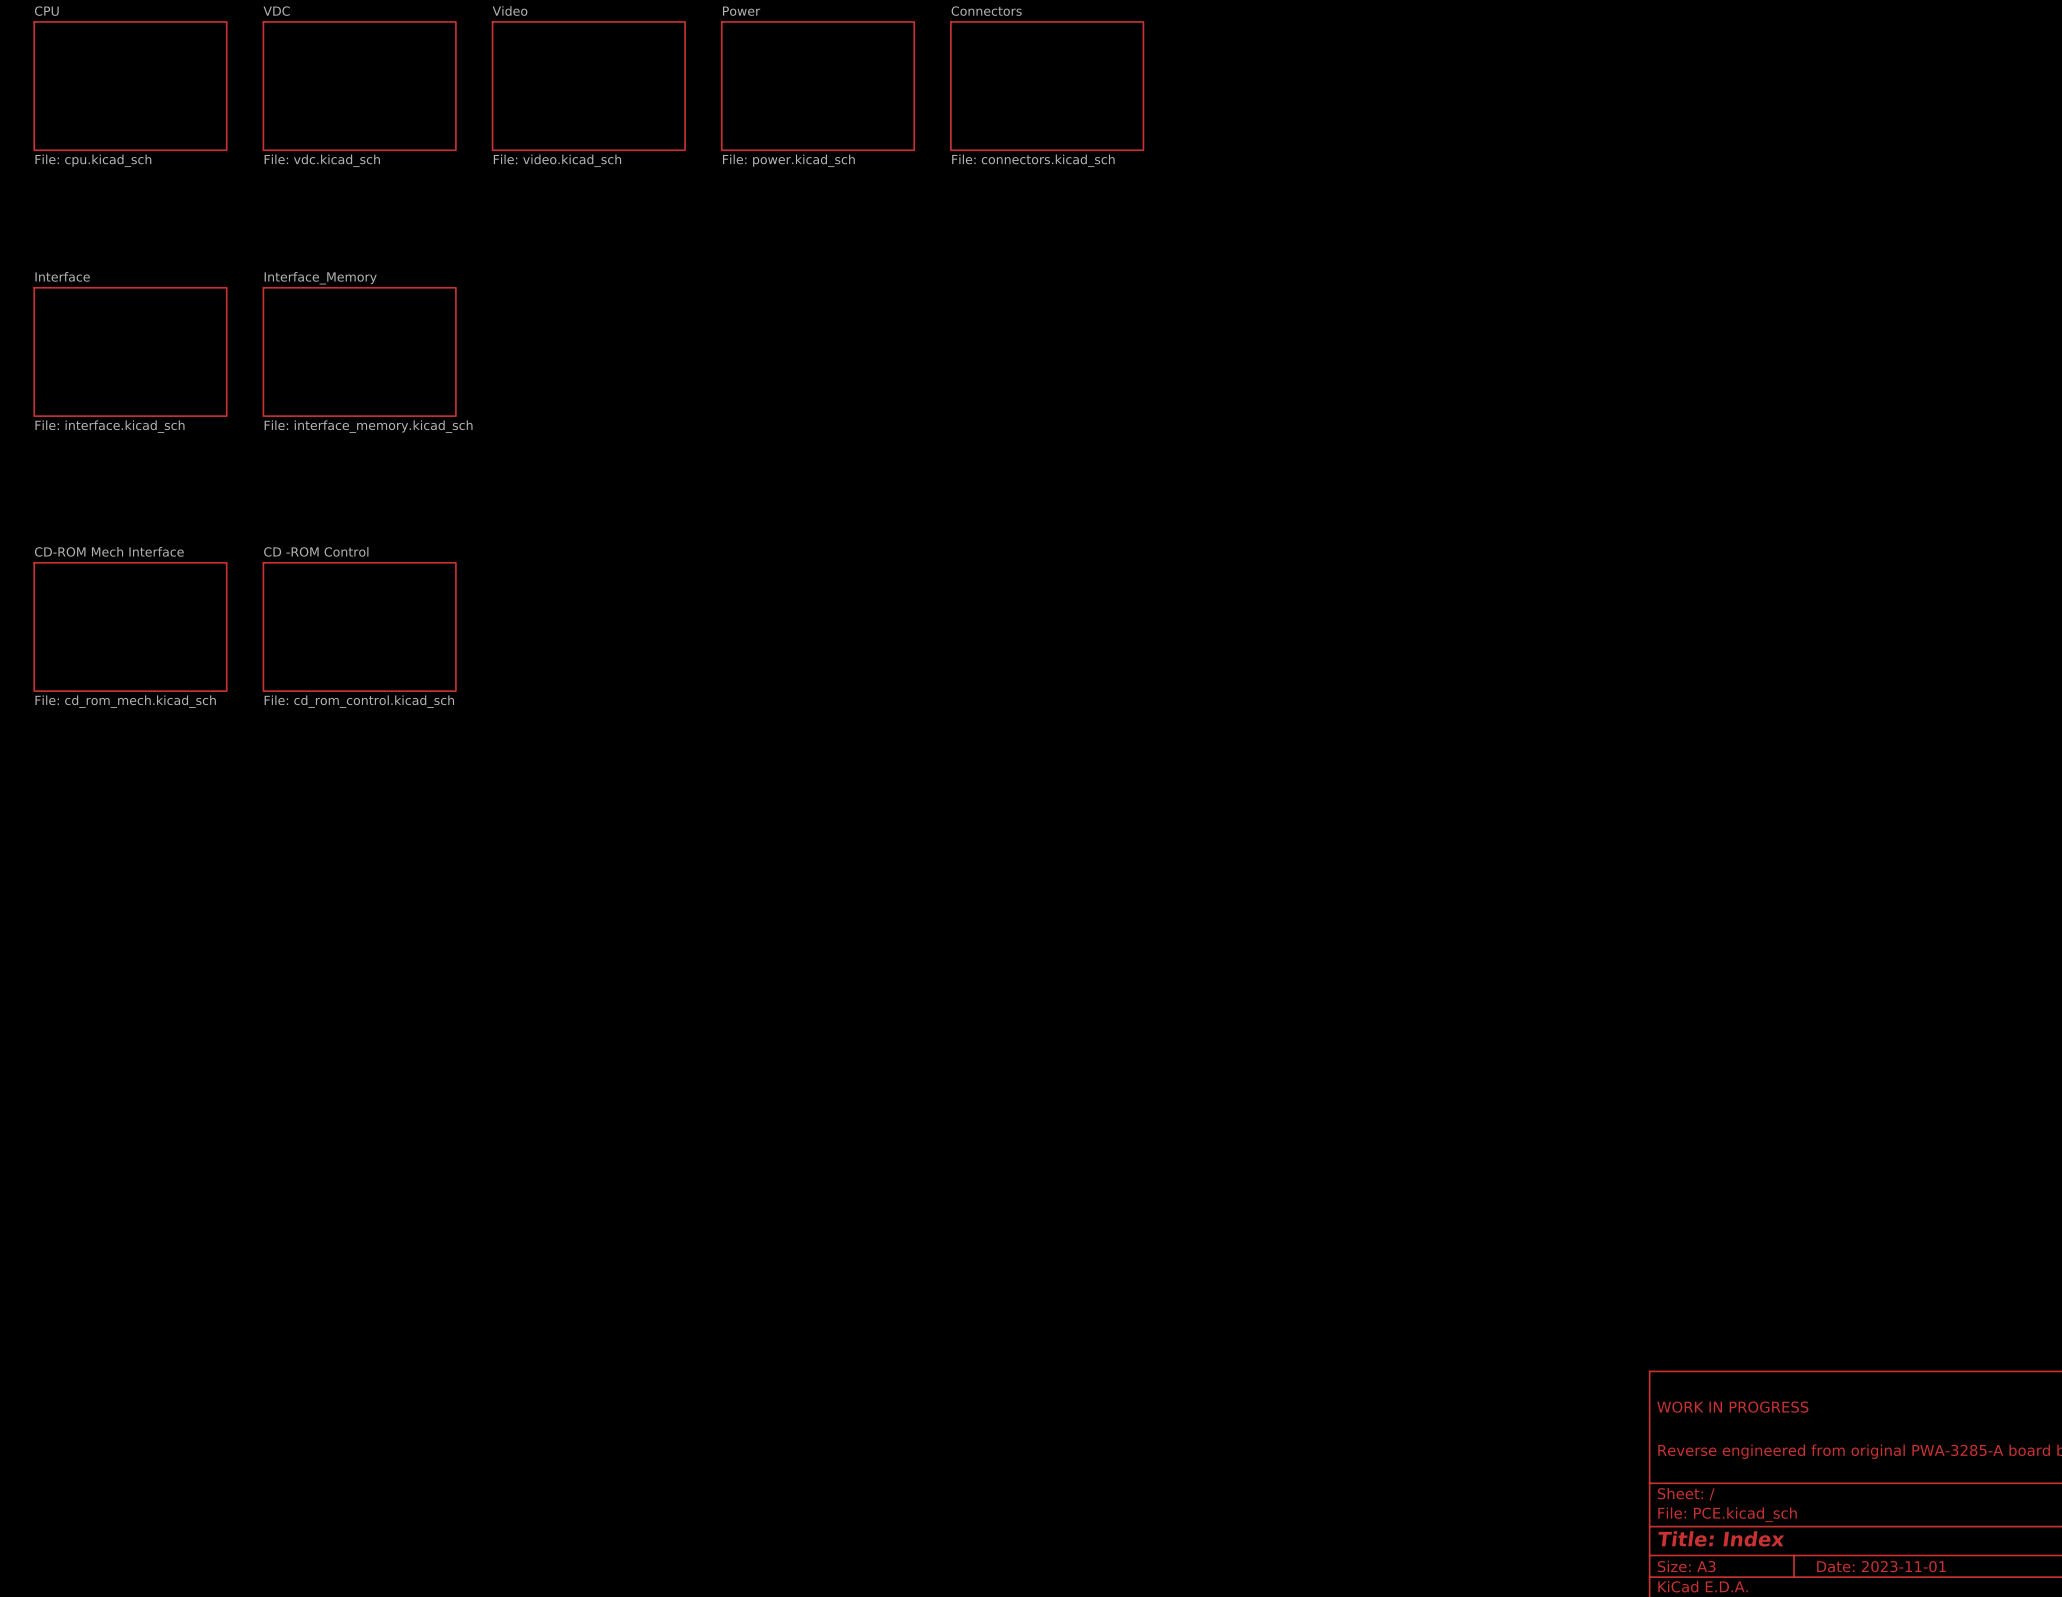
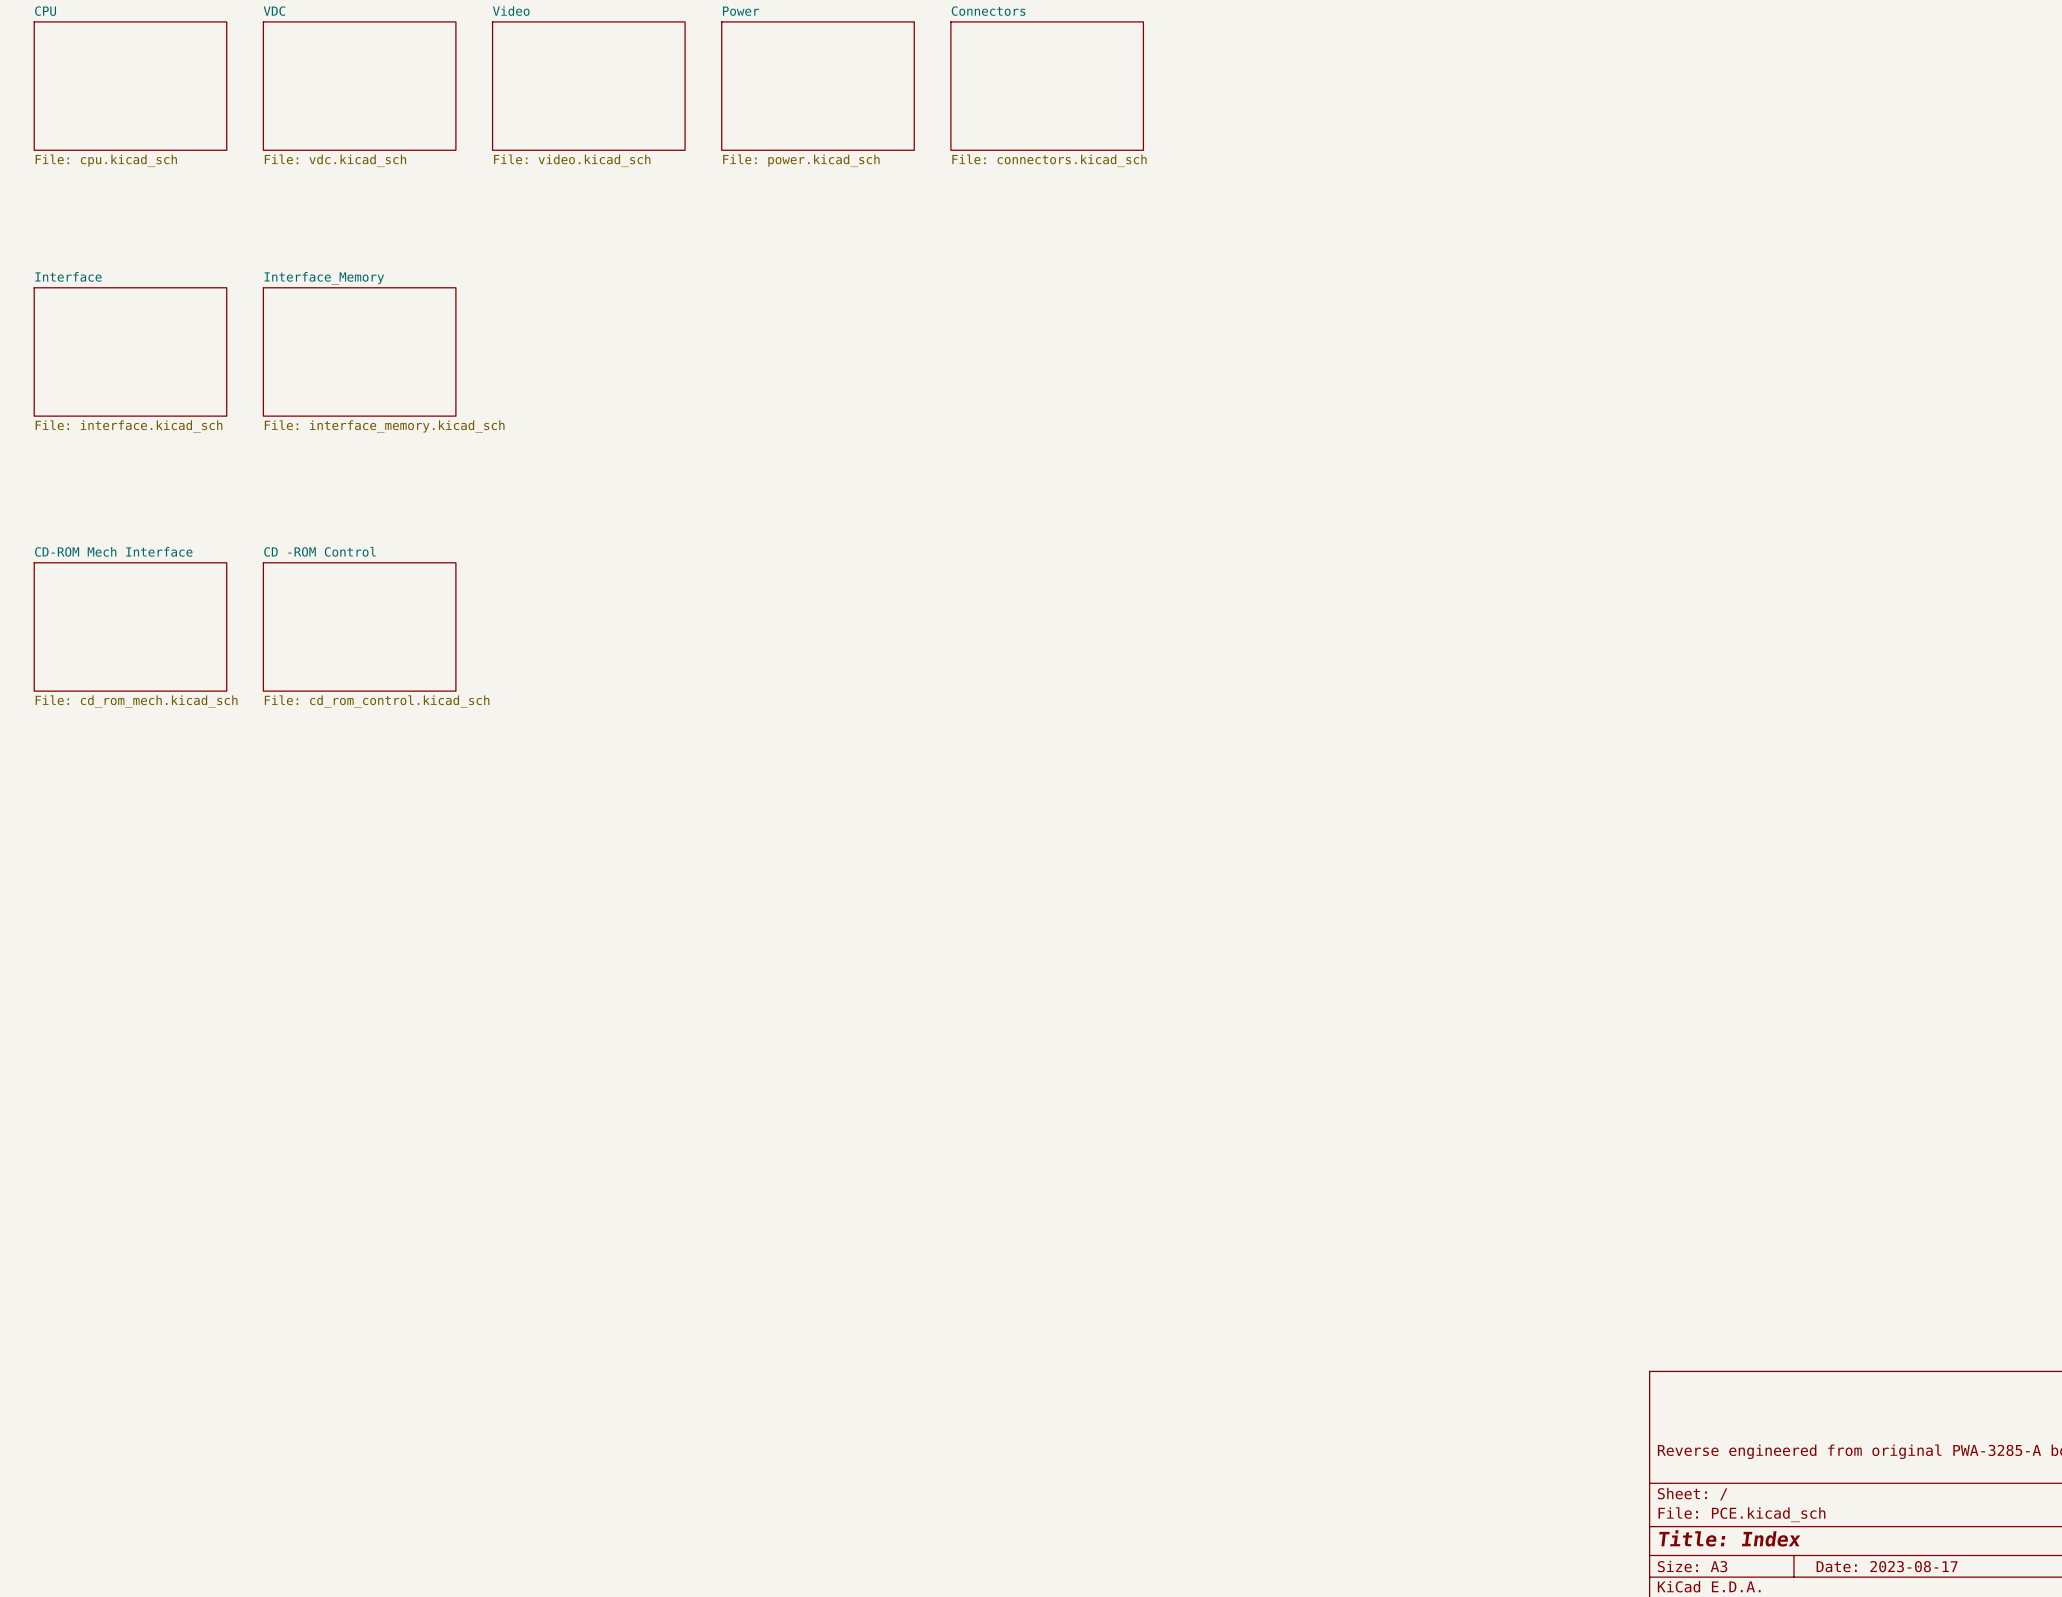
title block: WORK IN PROGRESS (1732, 1407) -> none
title block: Date: 2023-11-01 (1881, 1566) -> Date: 2023-08-17 (1887, 1566)

